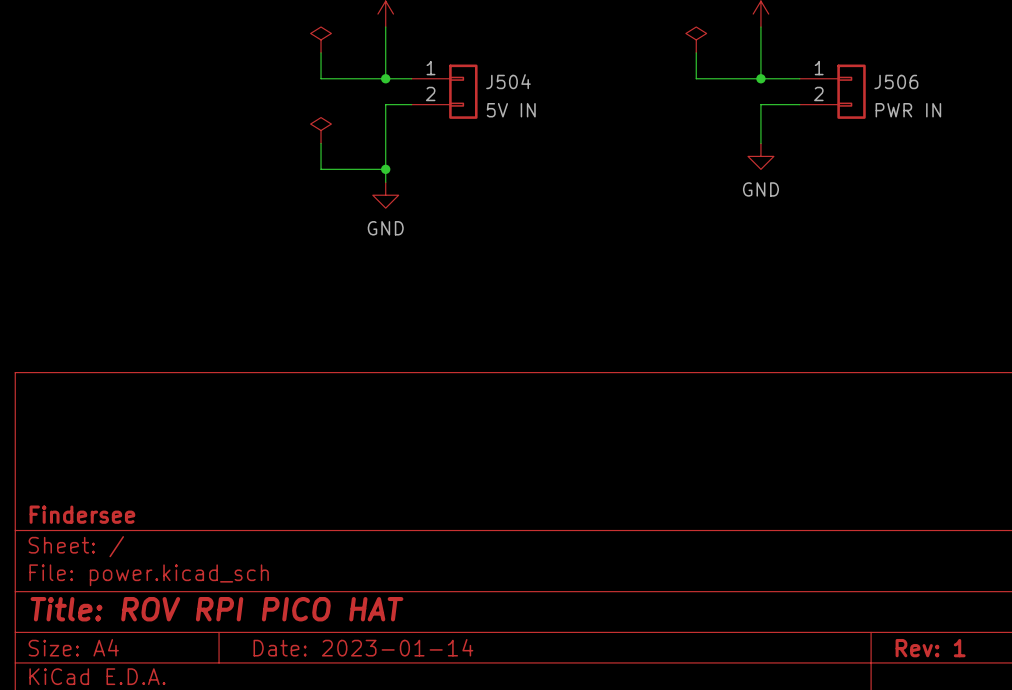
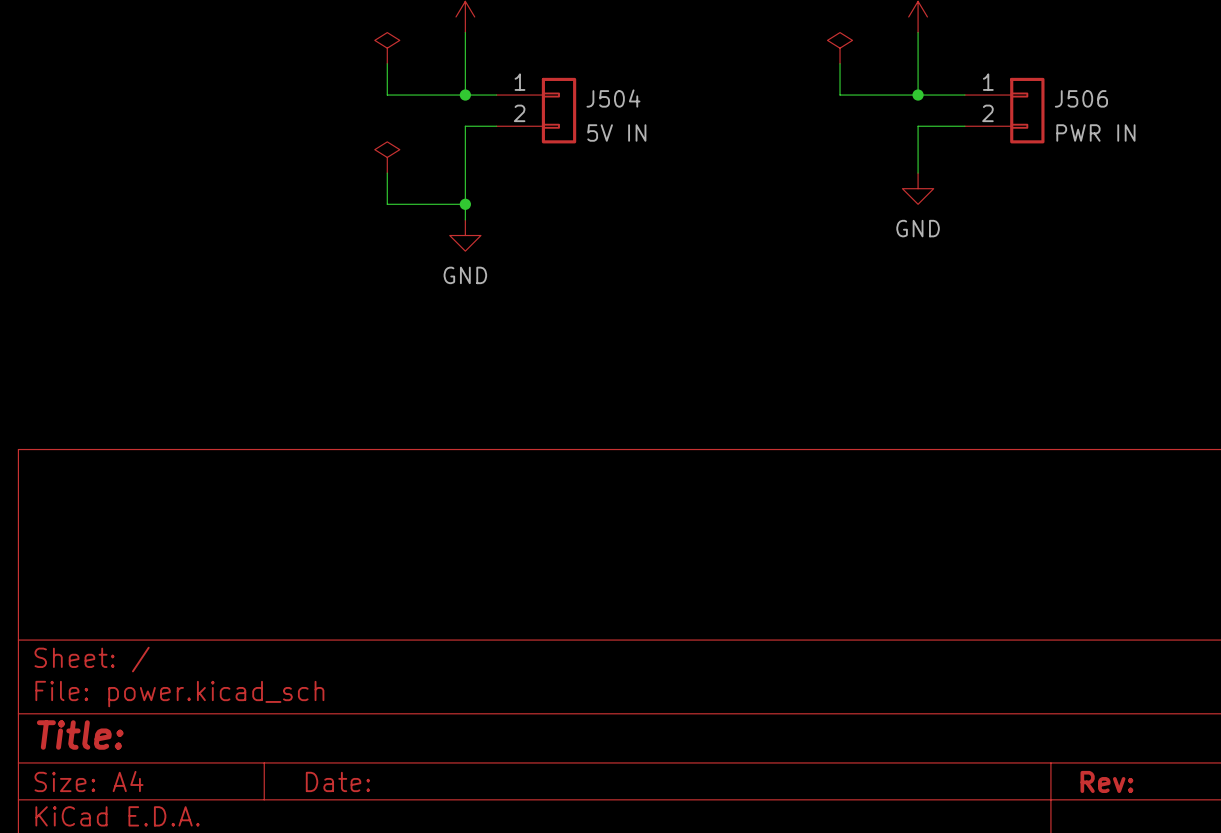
title block: Findersee (82, 514) -> none
title block: Title: ROV RPI PICO HAT (216, 609) -> Title: (80, 735)
title block: Date: 2023-01-14 (363, 647) -> Date: (337, 781)
title block: Rev: 1 (930, 648) -> Rev: (1106, 781)

